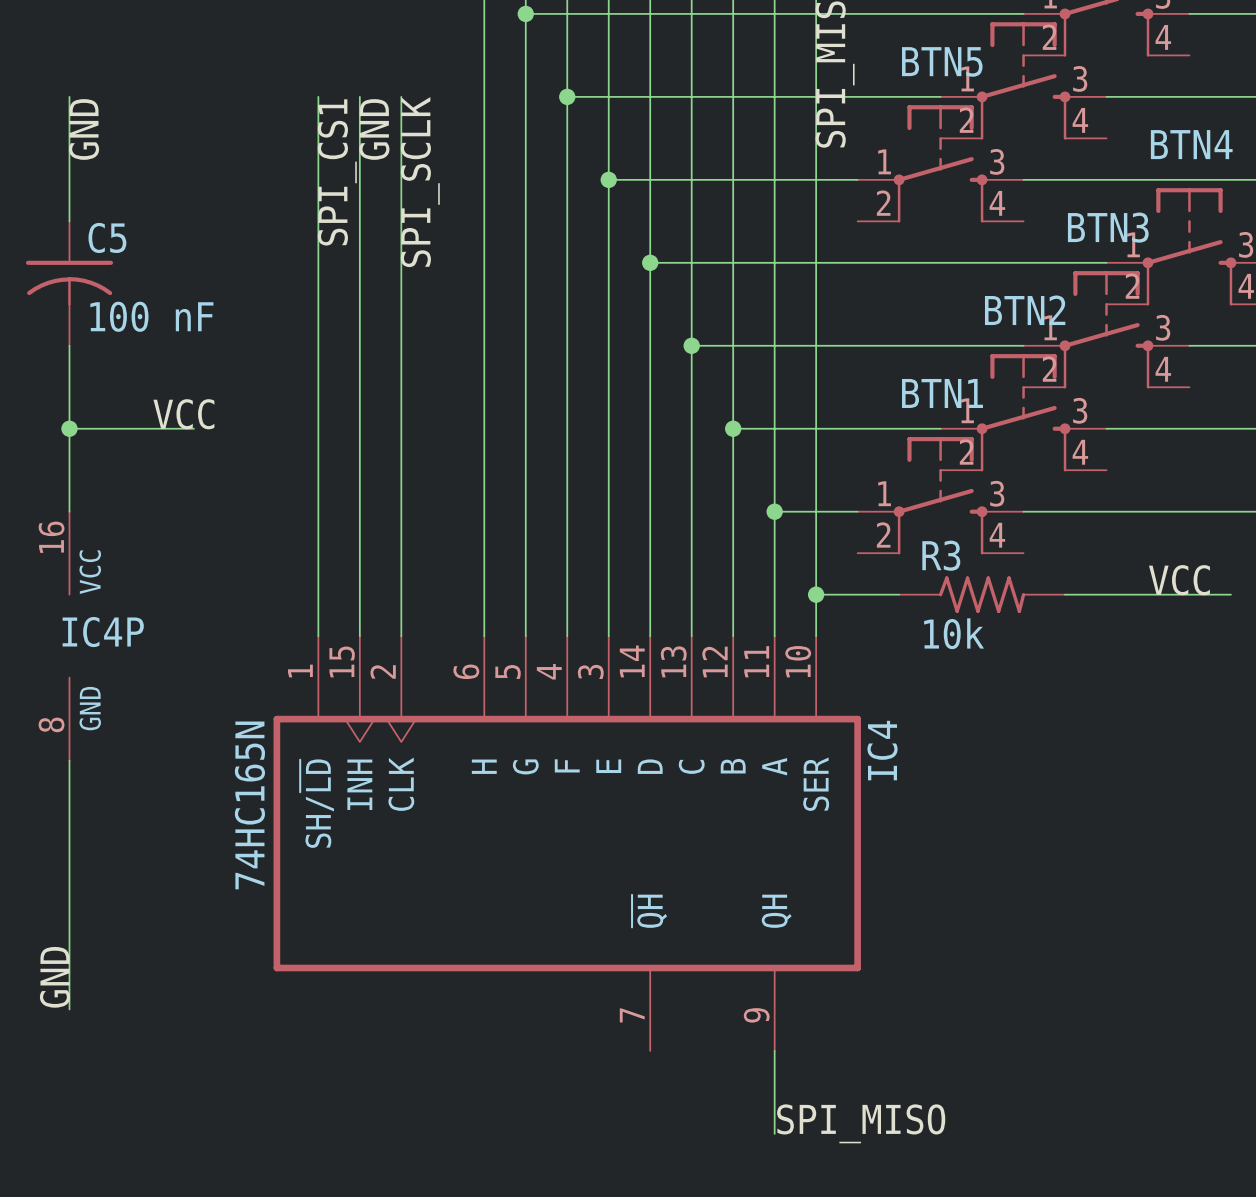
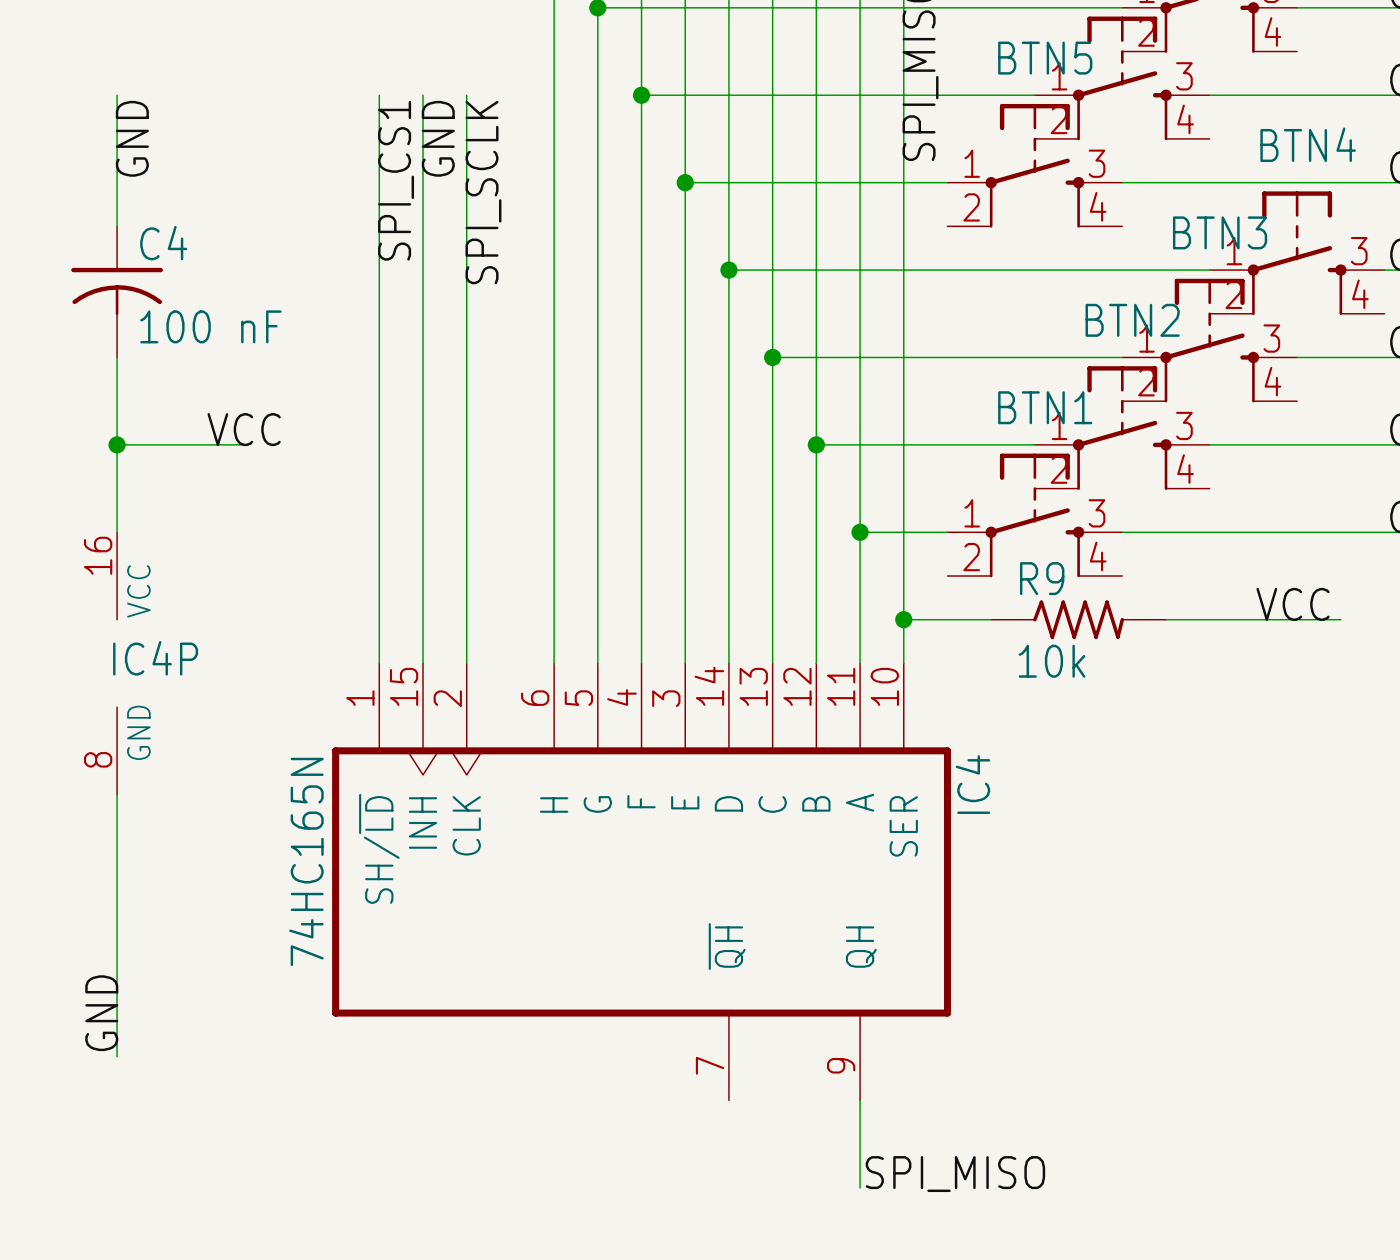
C5 name: C5 (107, 237) -> C4 (163, 243)
R3 name: R3 (941, 555) -> R9 (1042, 578)

